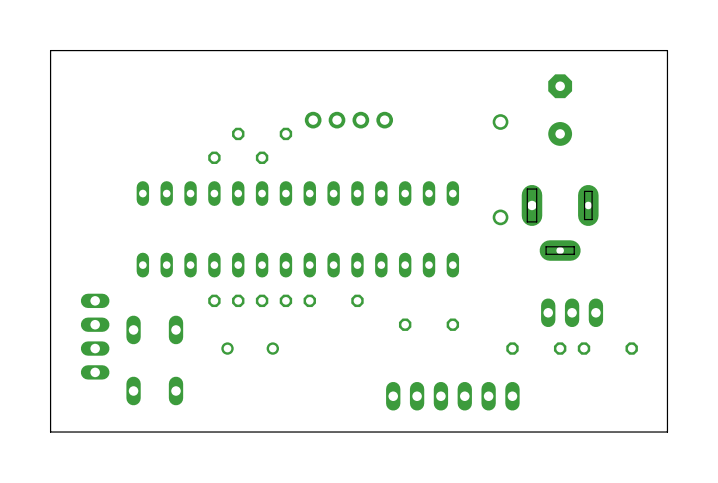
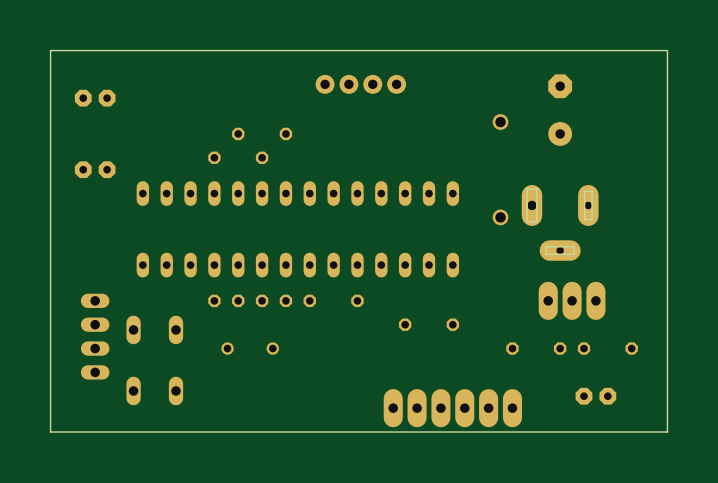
part: none -> (360, 84)
part: none -> (95, 98)
part: (348, 120) -> none
part: none -> (95, 169)
part: none -> (572, 300)
part: (572, 312) -> none
part: (452, 396) -> none
part: none -> (595, 396)
part: none -> (452, 408)

